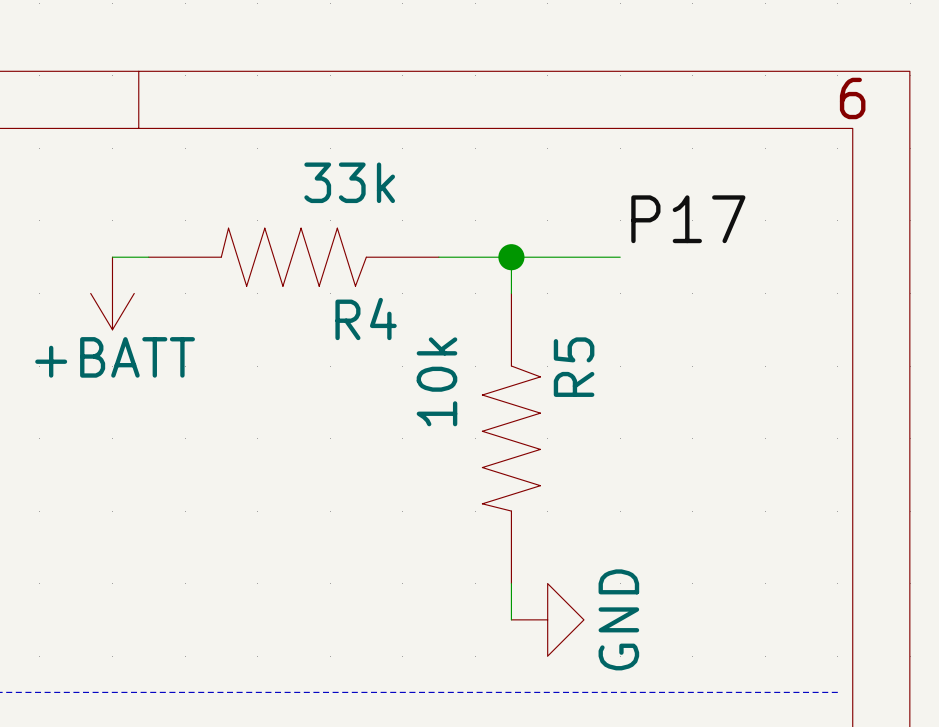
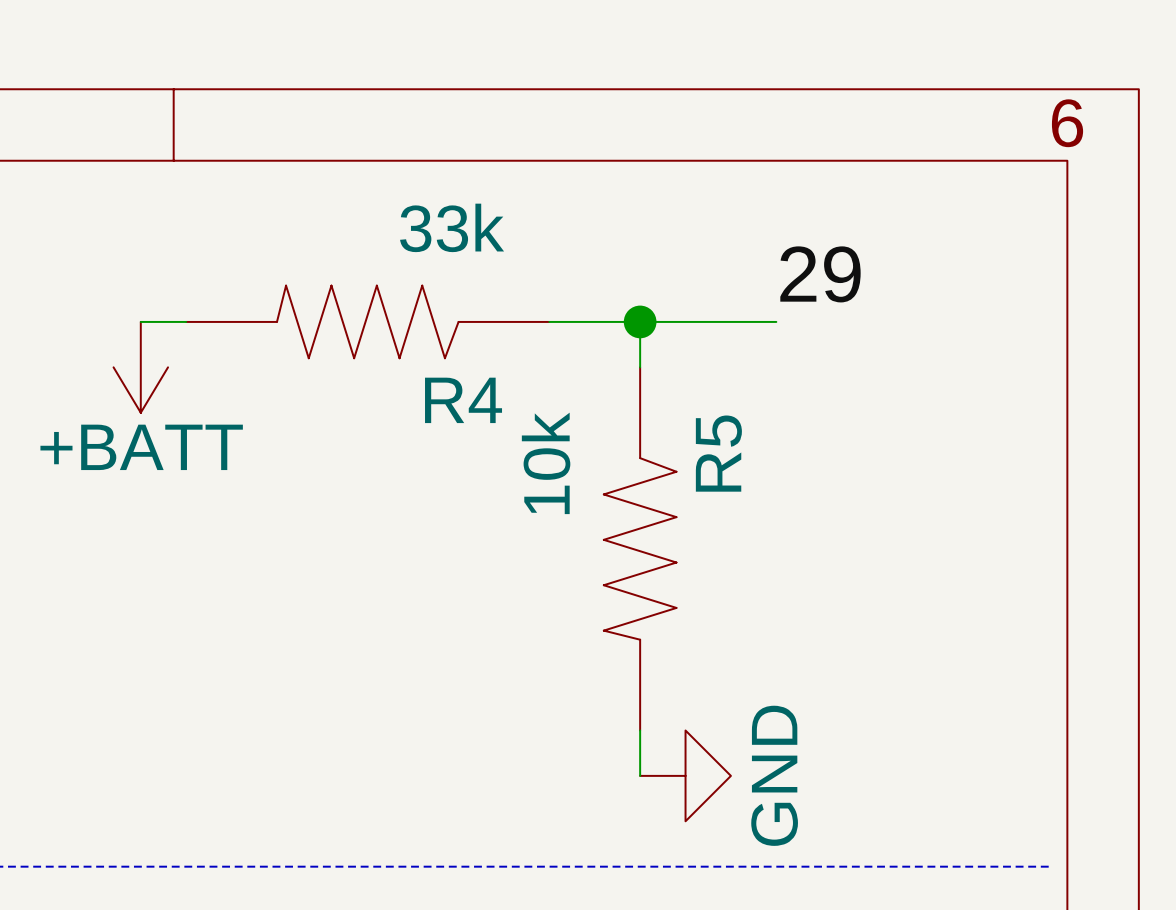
label: P17 (688, 219) -> 29 (820, 274)

